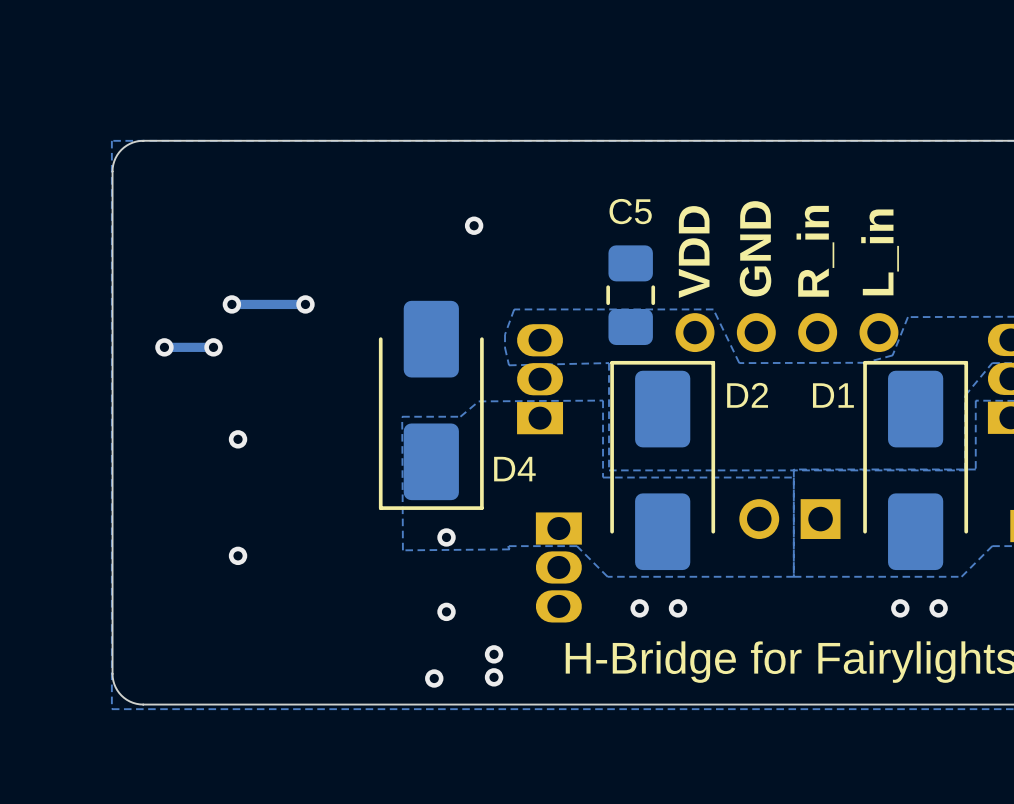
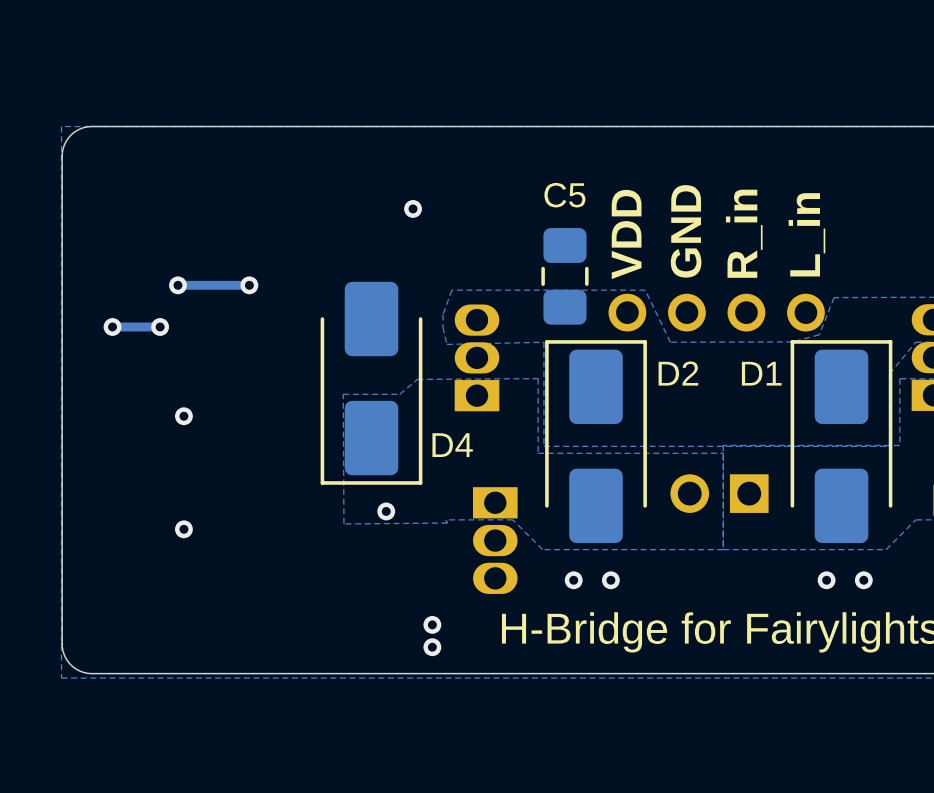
via: (446, 611) -> none
via: (434, 678) -> none

